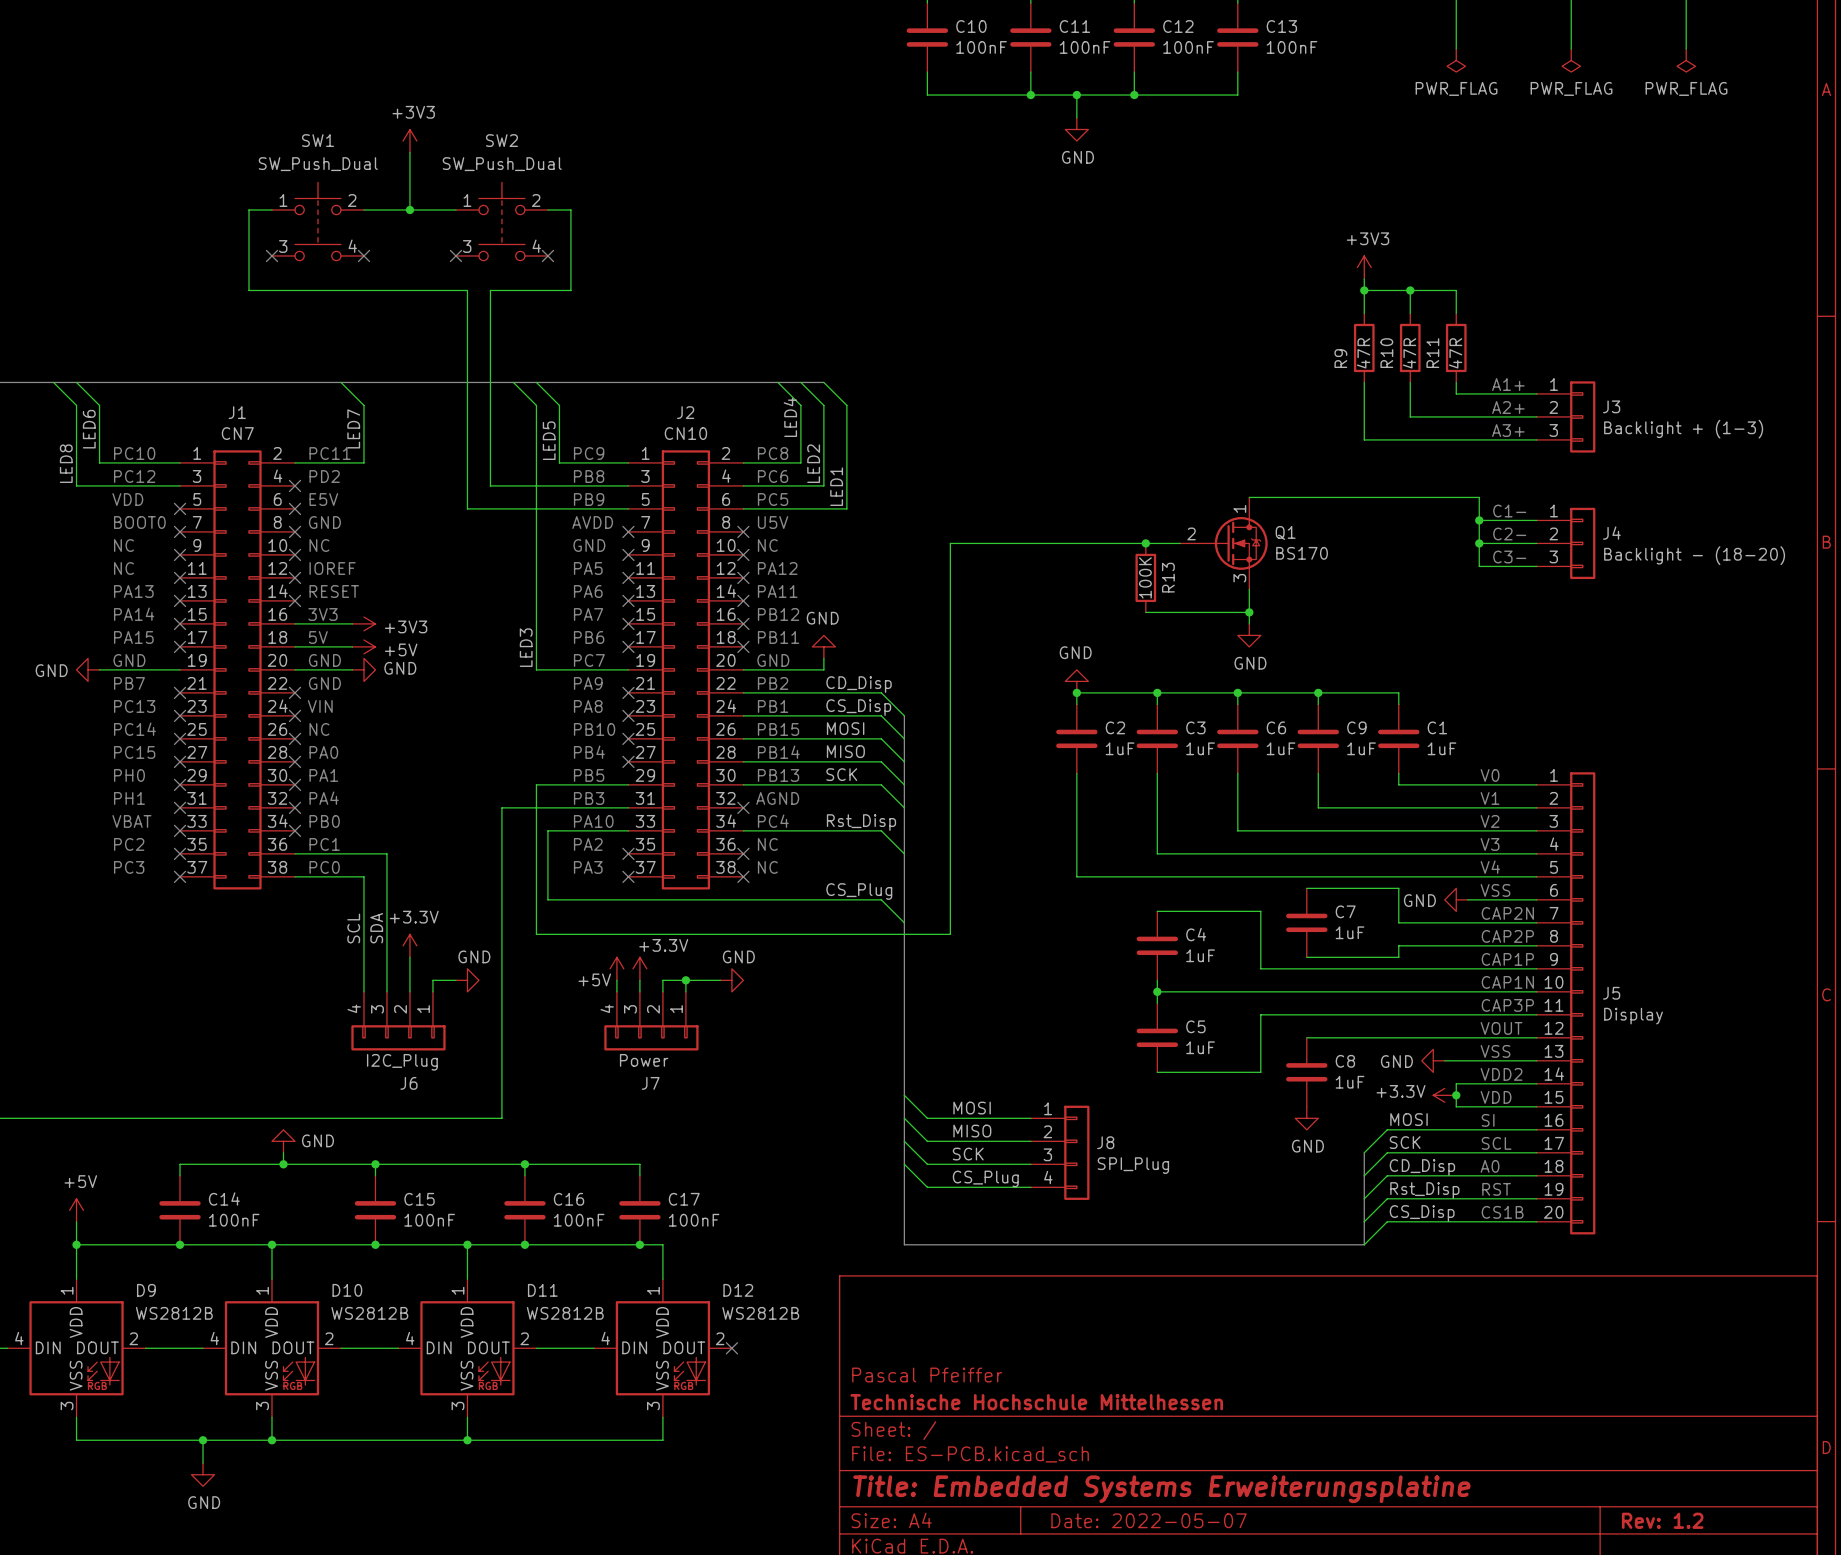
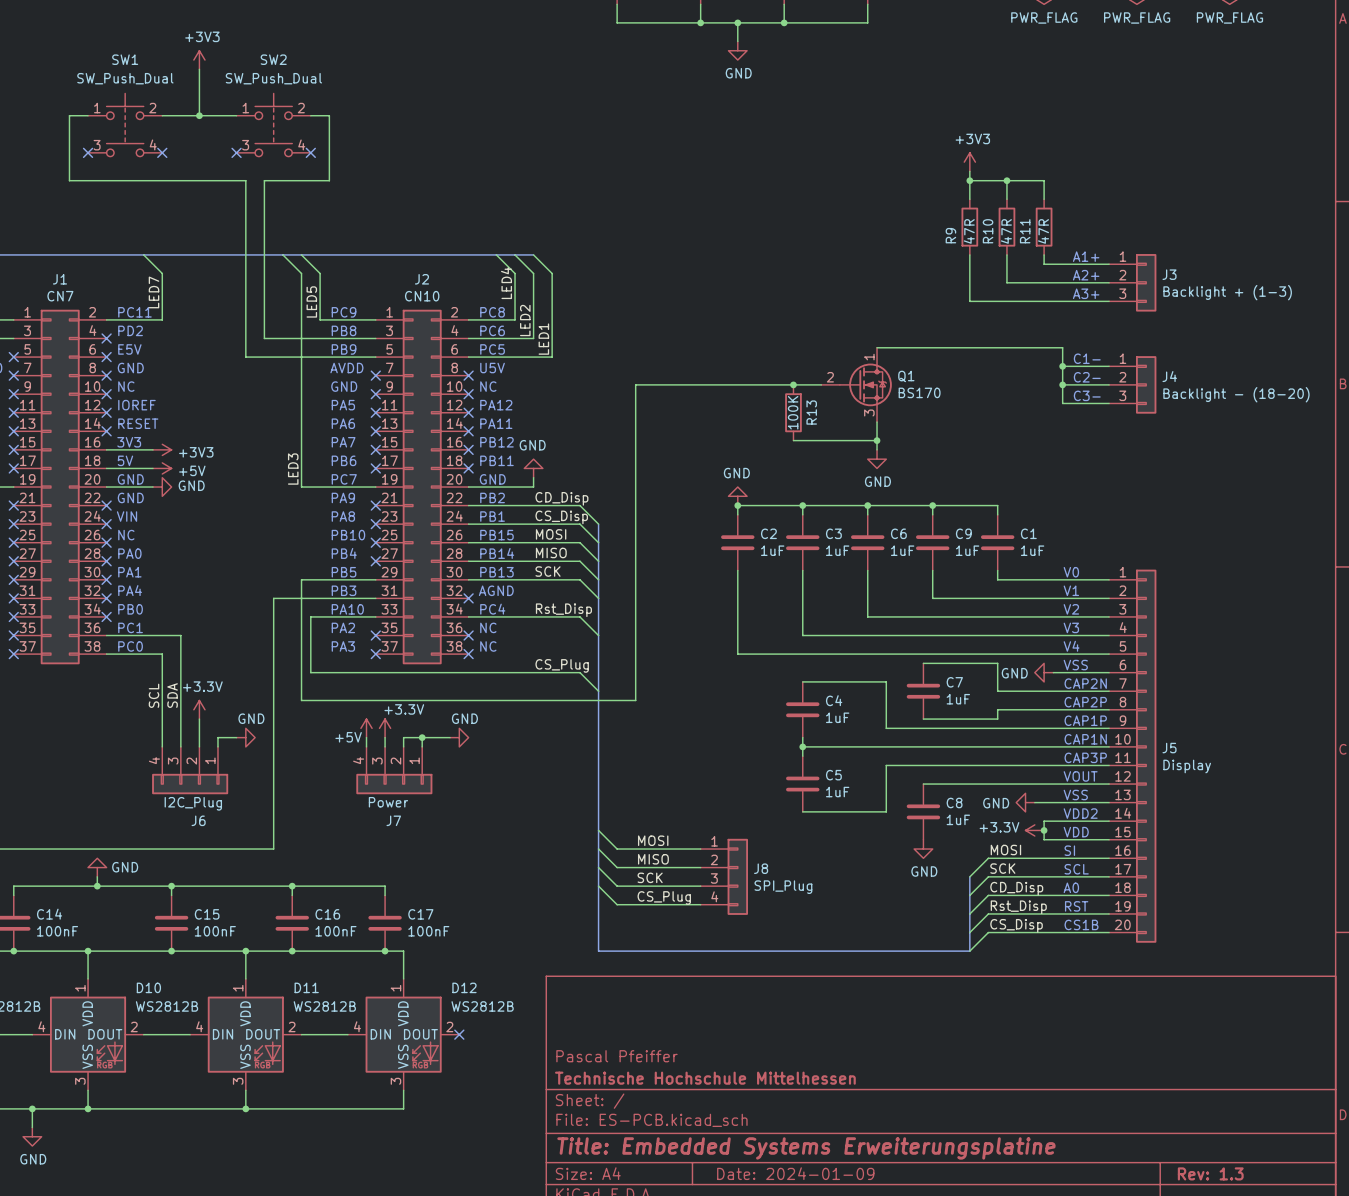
title block: Date: 2022-05-07 (1149, 1520) -> Date: 2024-01-09 (795, 1173)
title block: Rev: 1.2 (1662, 1520) -> Rev: 1.3 (1210, 1173)

